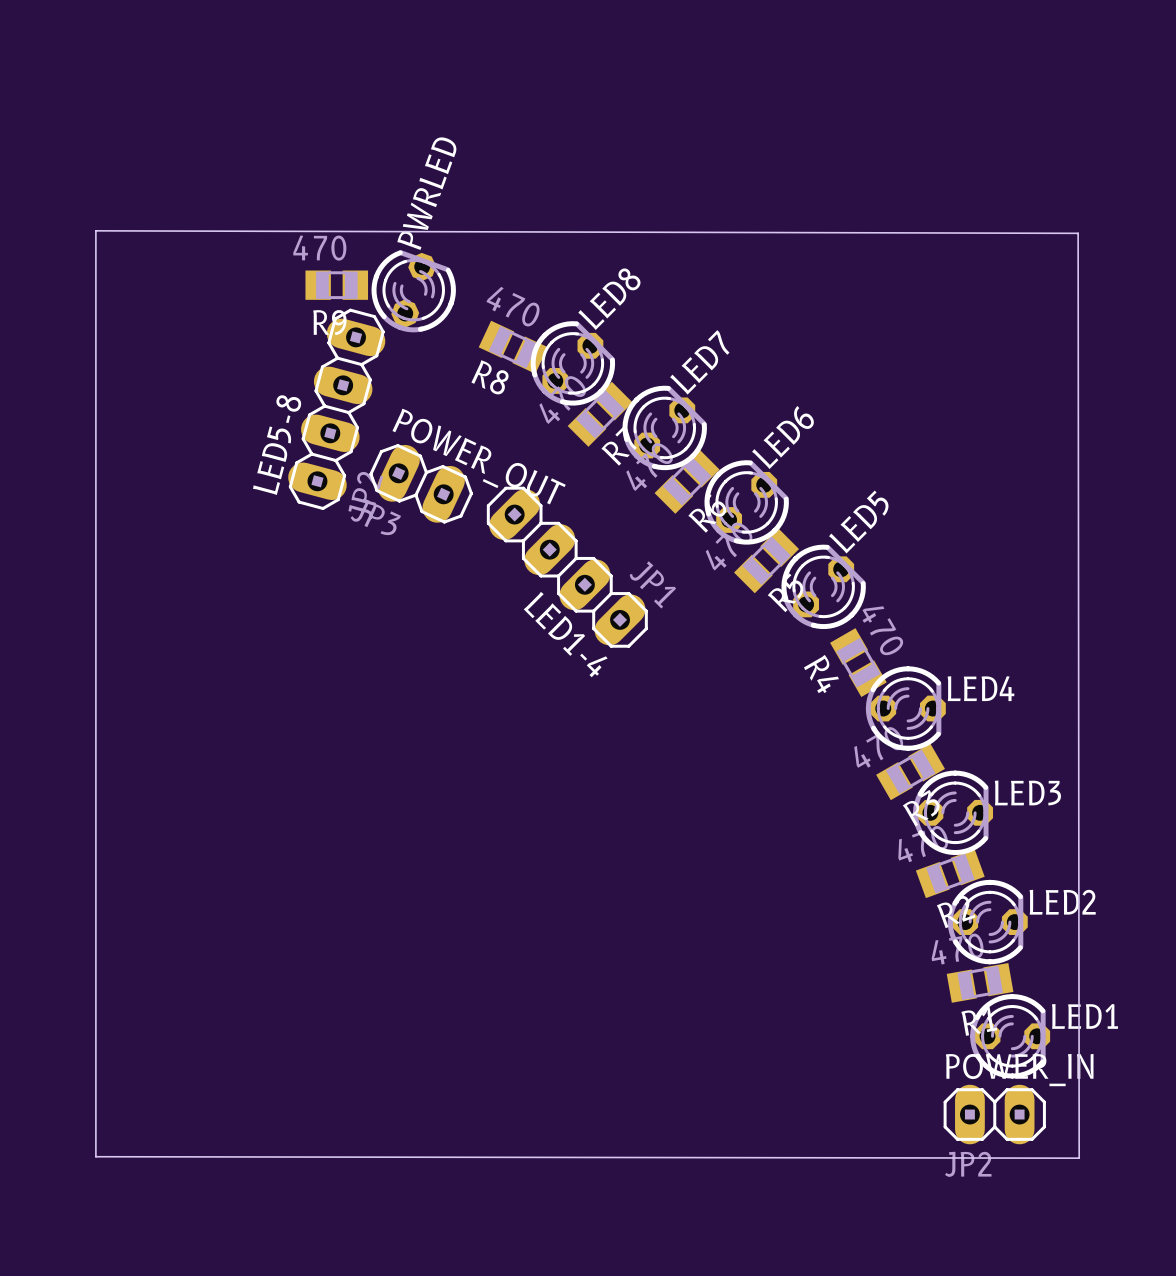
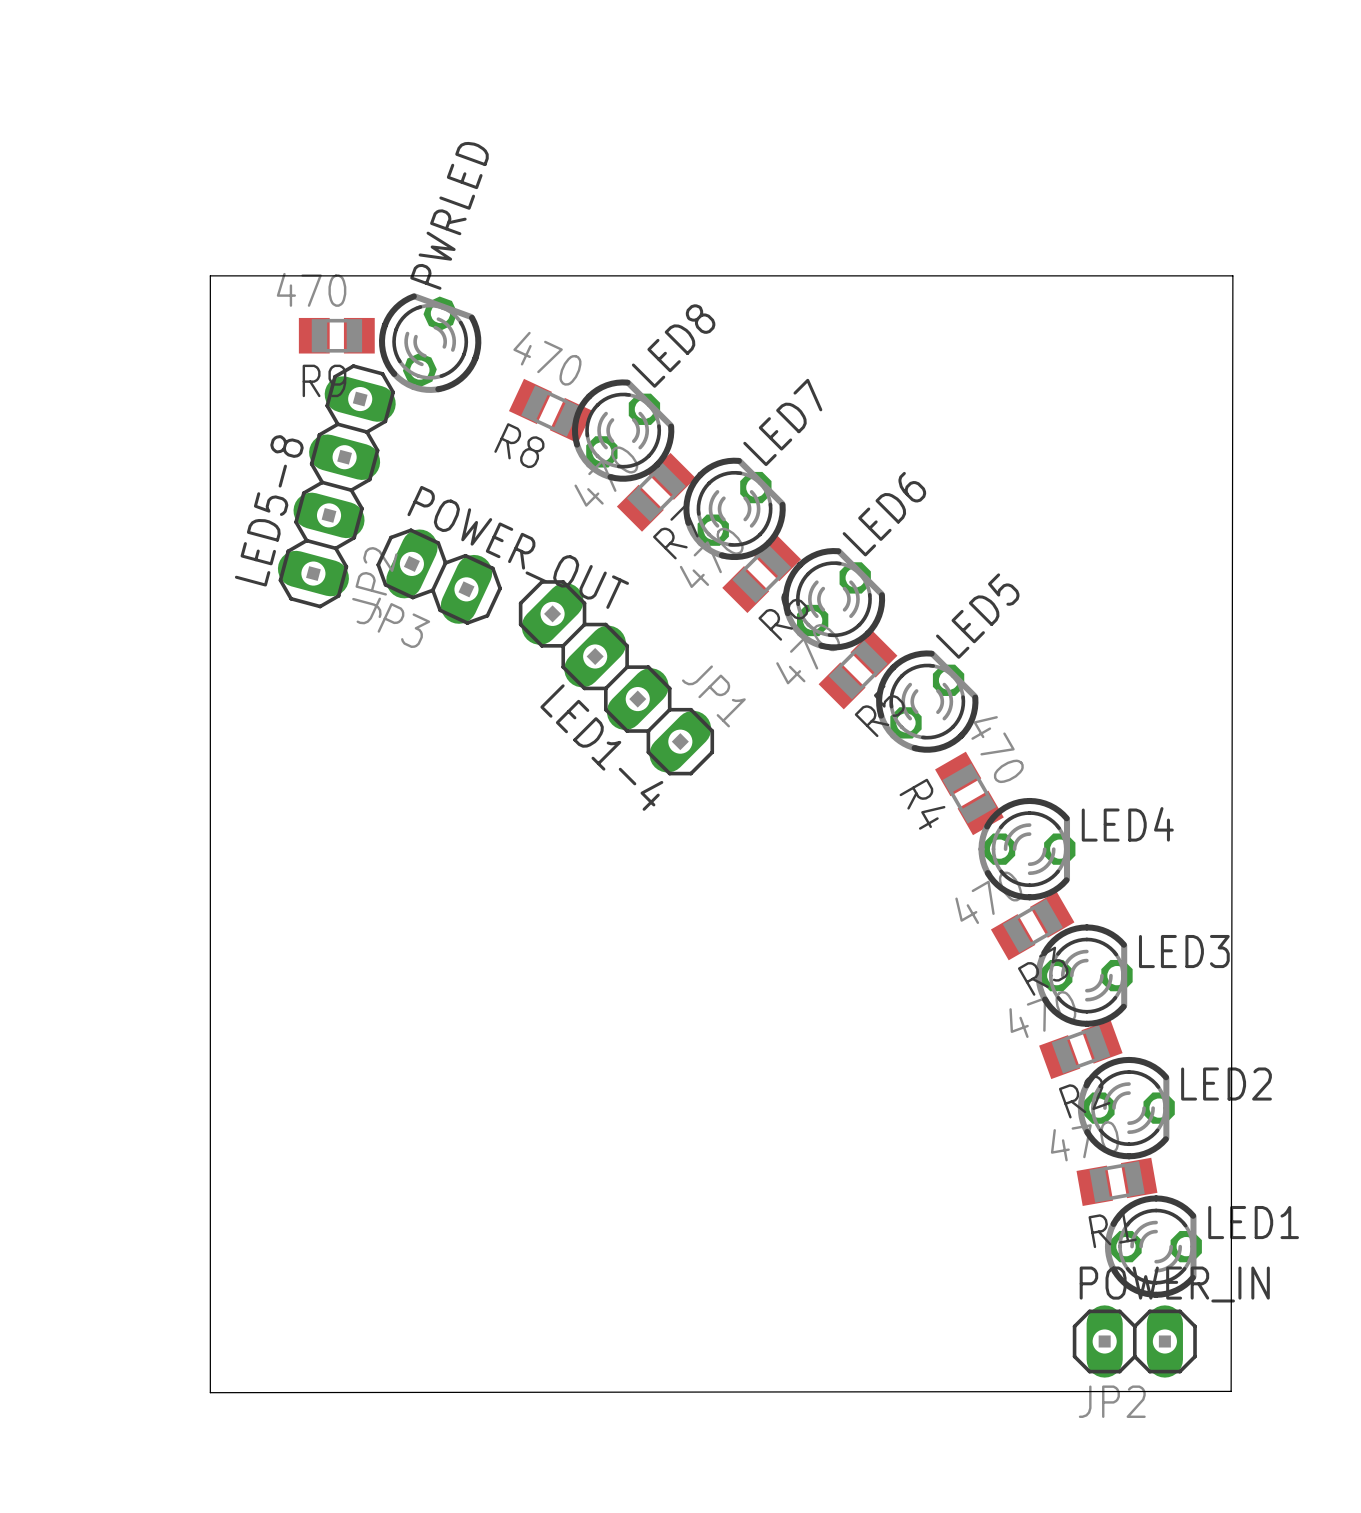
board edge: (95, 230) (1078, 233) (1079, 1158) (95, 1156) (95, 230) -> (210, 275) (210, 1392) (1231, 1391) (1232, 275) (210, 275)

